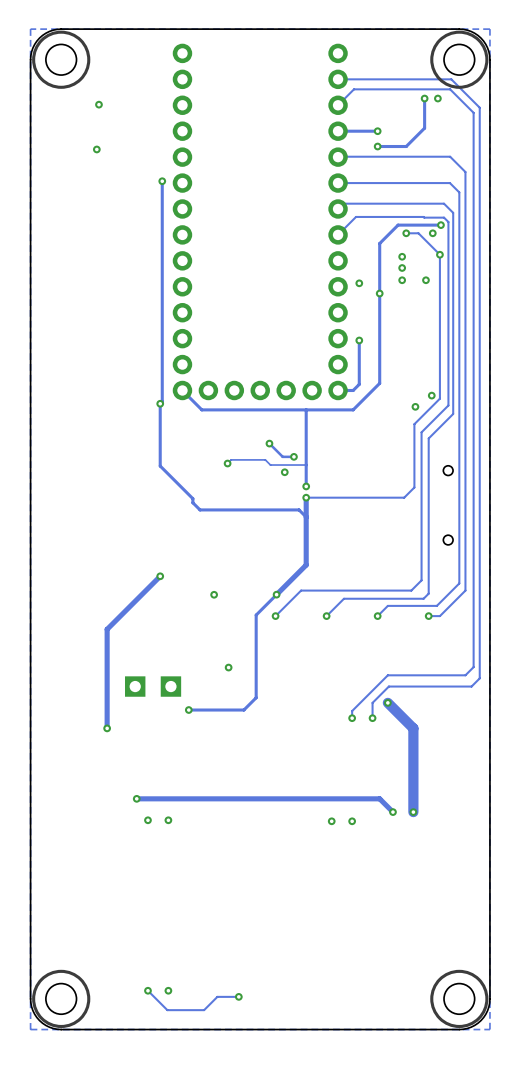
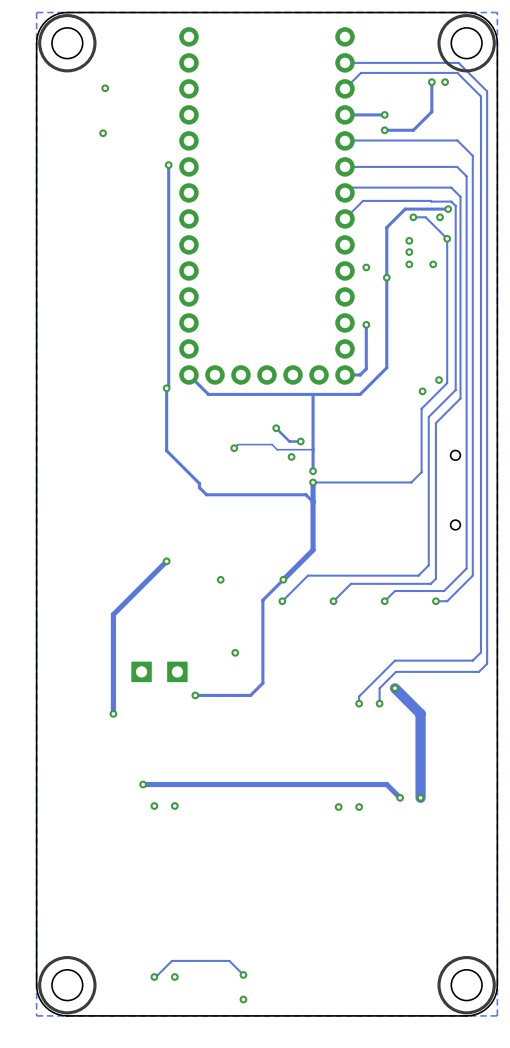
track: none -> (243, 974) (229, 960) (171, 960) (157, 974) (154, 974)
via: none -> (243, 974)
track: (147, 990) (167, 1010) (204, 1010) (217, 996) (238, 996) -> none
via: (238, 996) -> none
via: none -> (243, 999)

